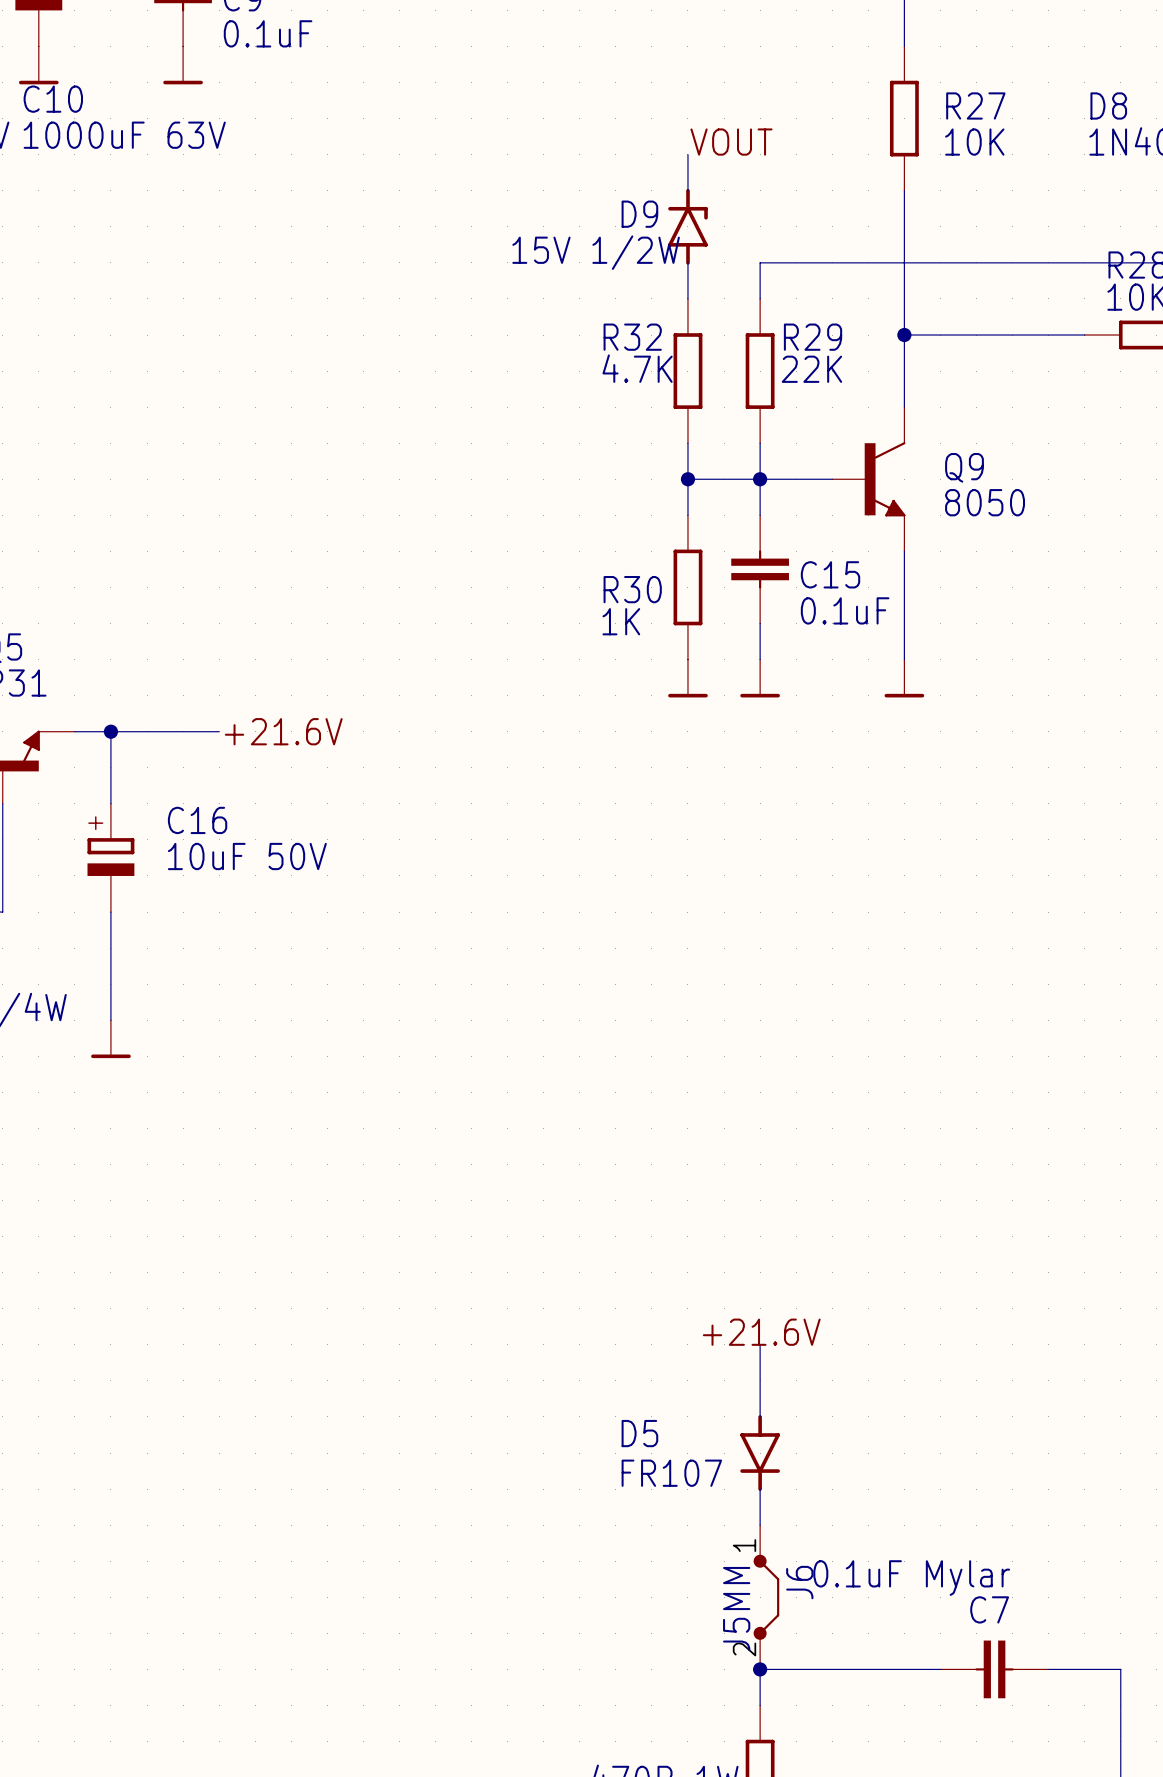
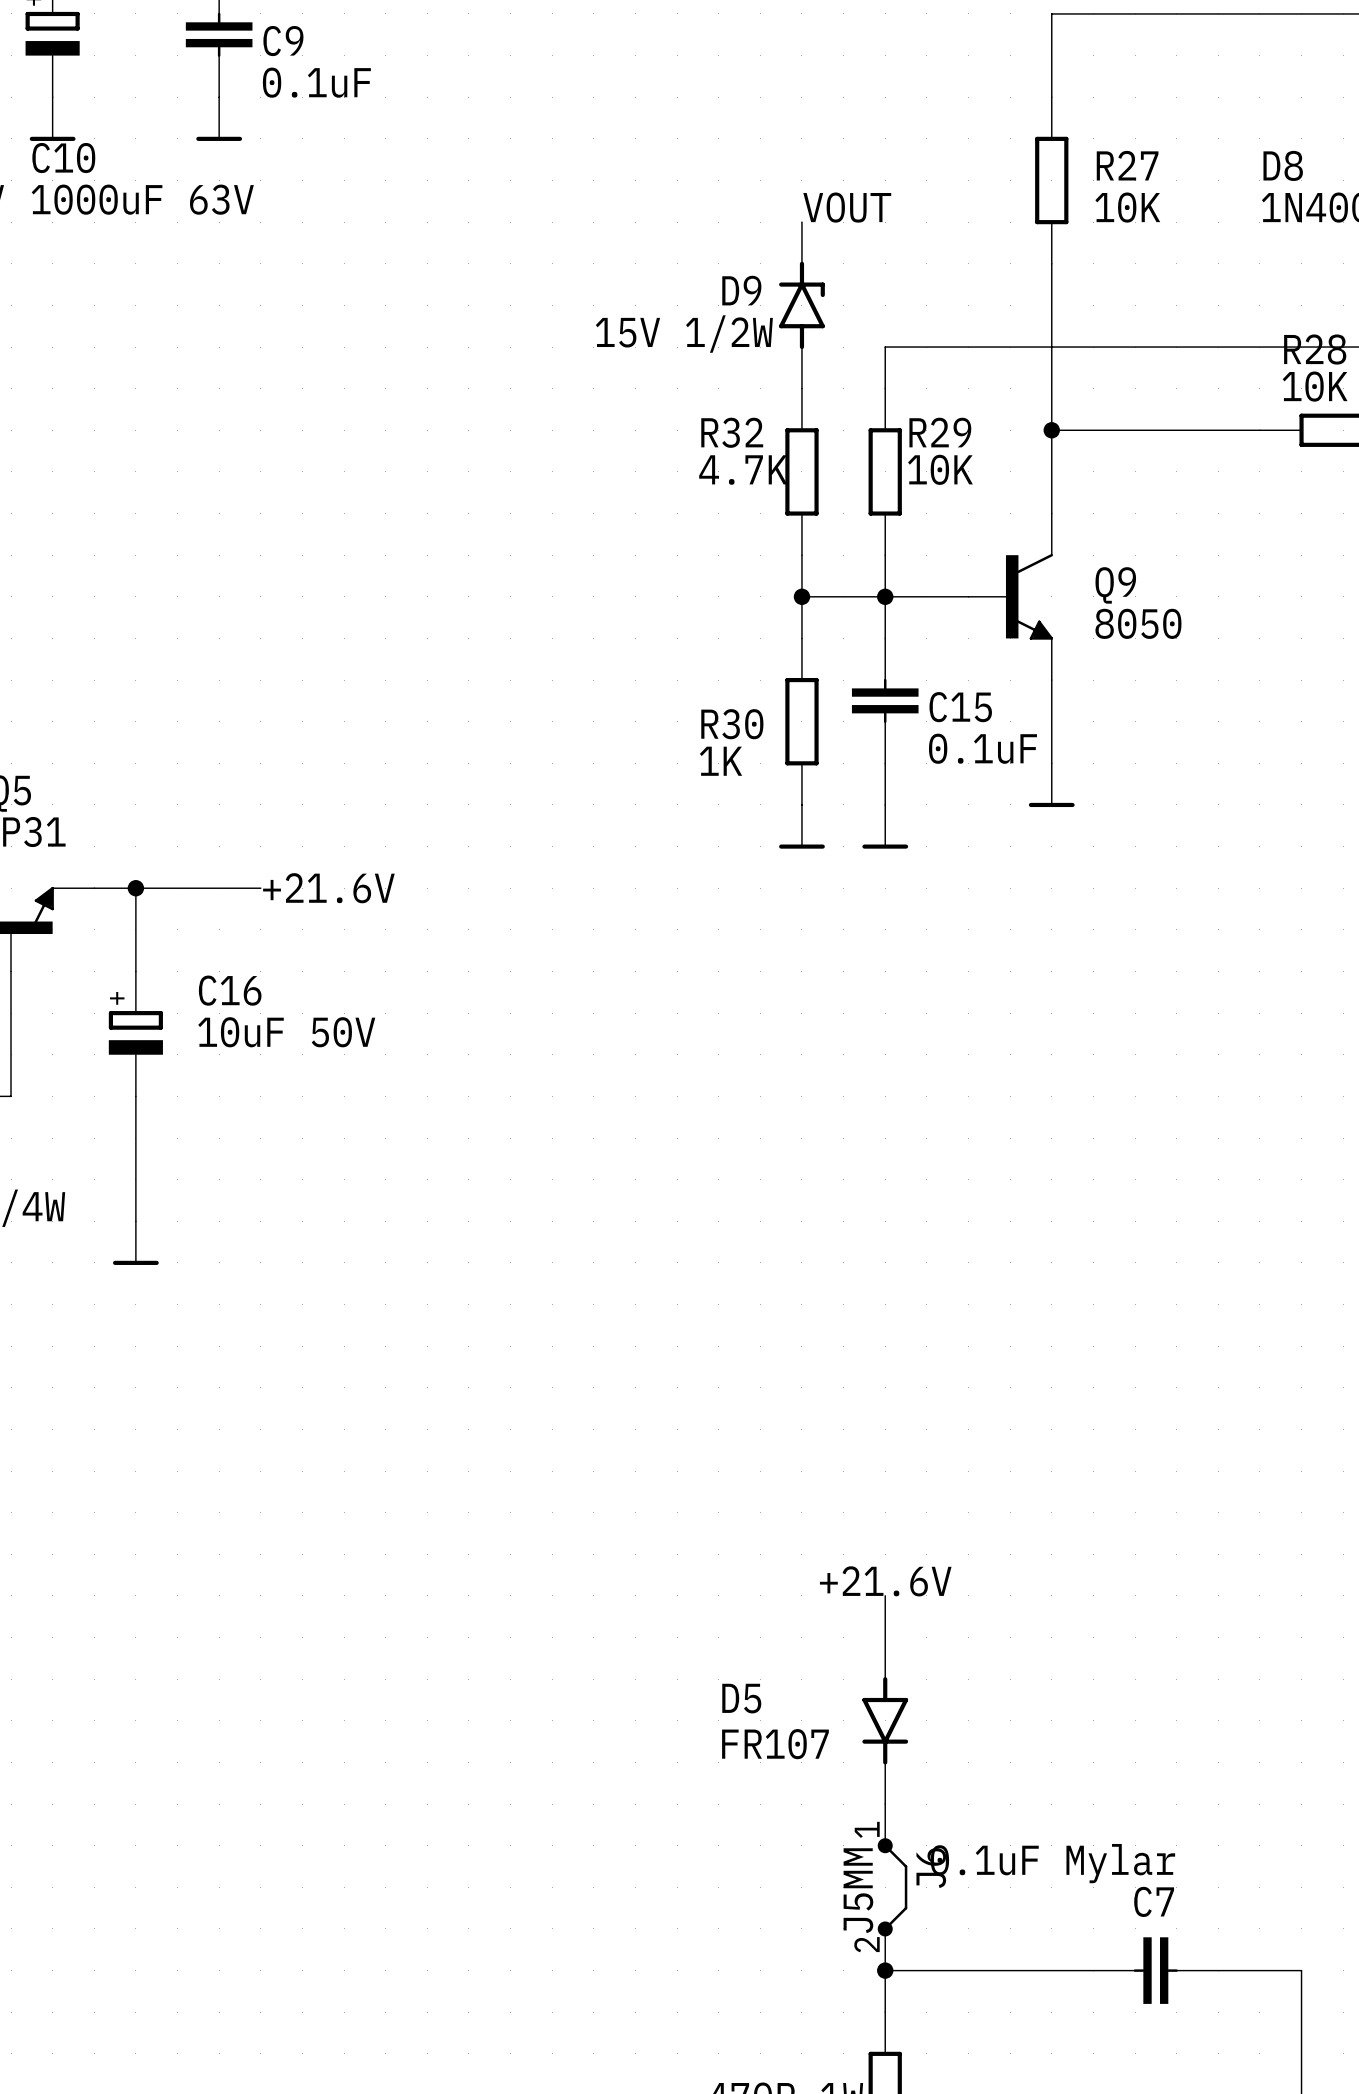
R29 value: 22K (811, 369) -> 10K (940, 469)
power symbol position: (904, 678) -> (1051, 785)

